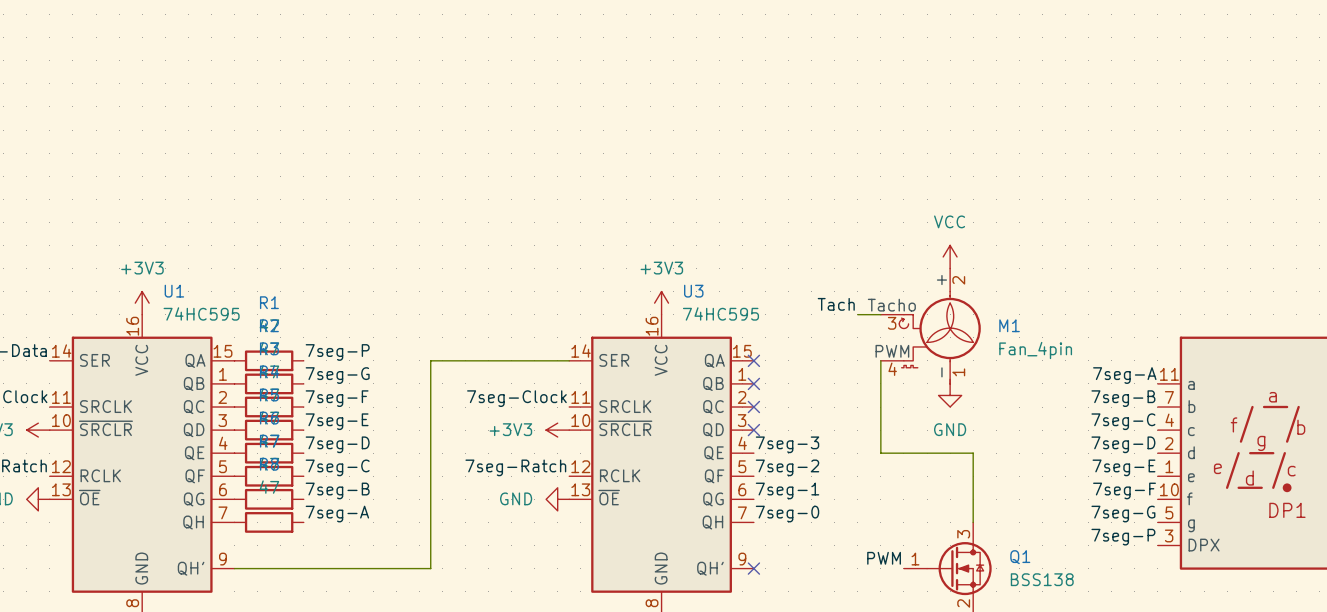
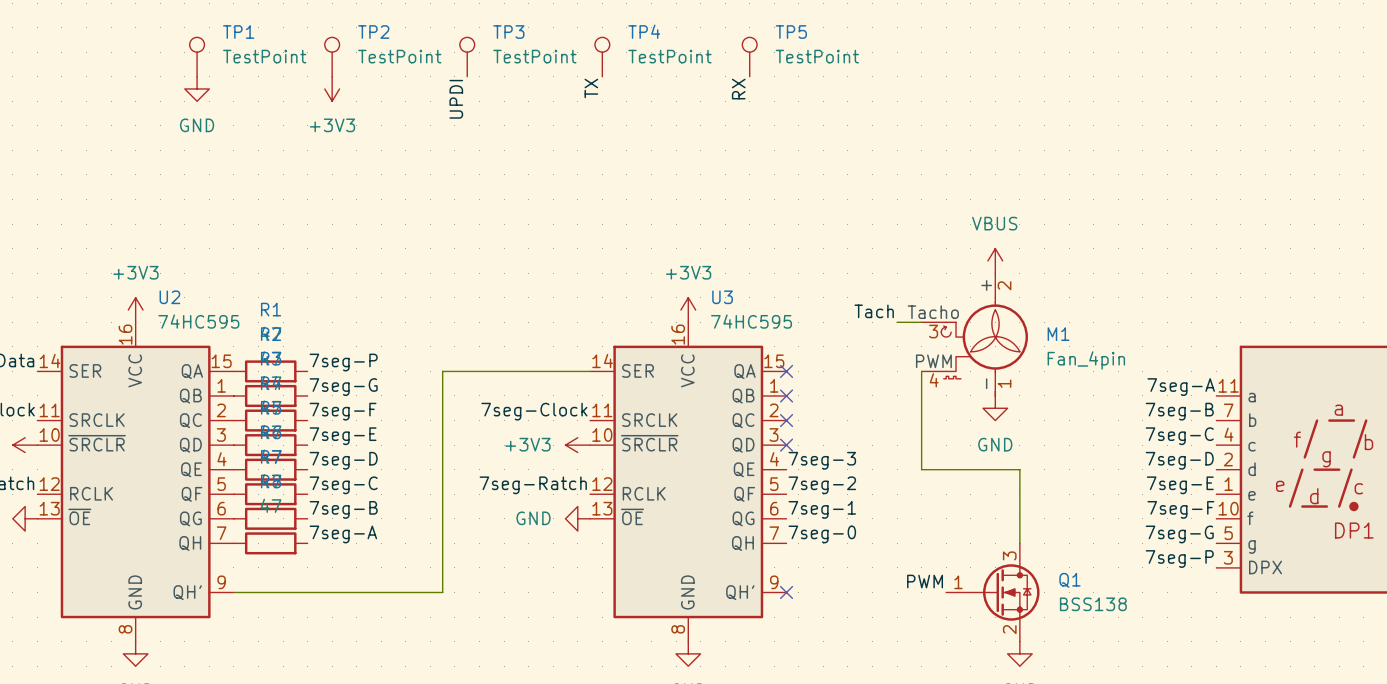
TP1: none -> TestPoint (197, 57)
TP2: none -> TestPoint (332, 57)
TP3: none -> TestPoint (467, 57)
TP4: none -> TestPoint (602, 57)
TP5: none -> TestPoint (749, 57)
label: none -> TX (591, 88)
power symbol: none -> GND (197, 88)
power symbol: none -> +3V3 (332, 88)
label: none -> RX (738, 89)
label: none -> UPDI (456, 99)
power symbol: VCC (950, 256) -> VBUS (995, 260)
U1 name: U1 (174, 291) -> U2 (169, 297)

